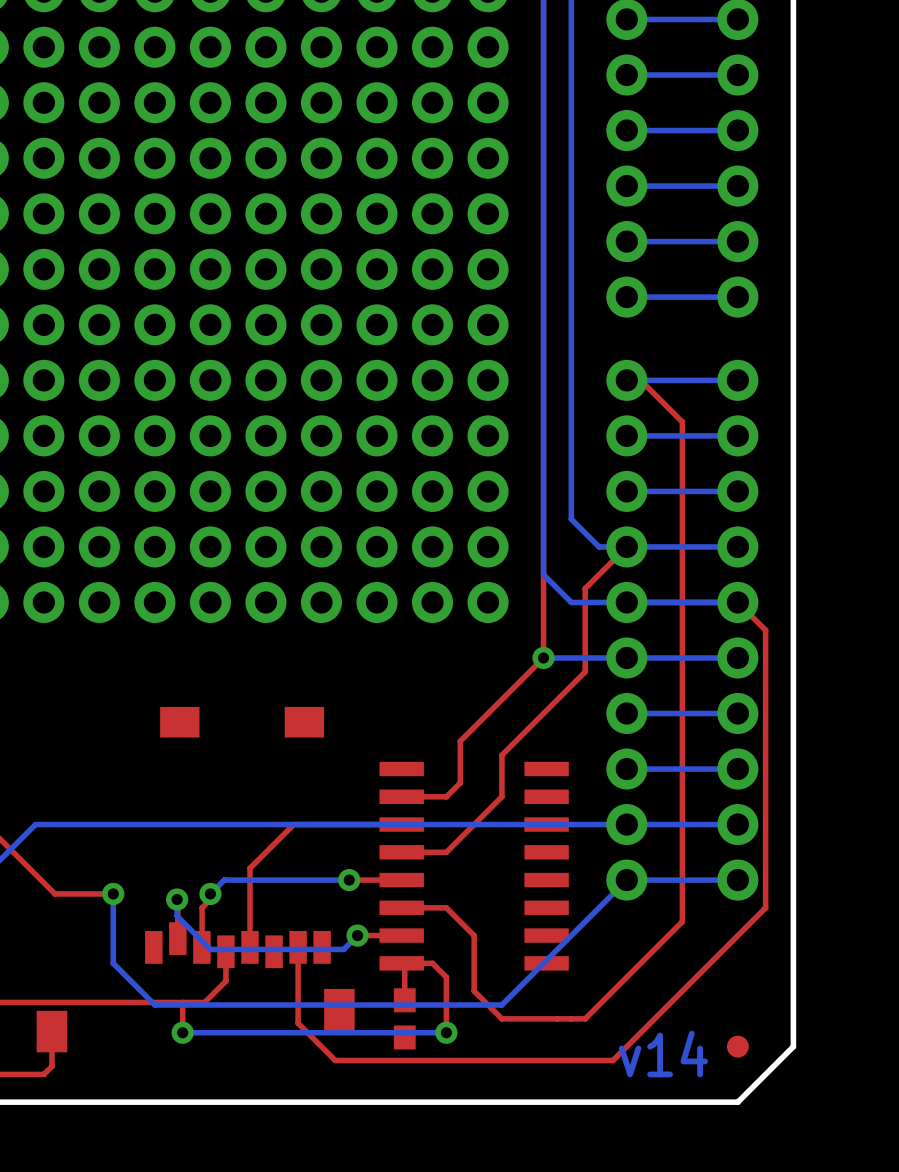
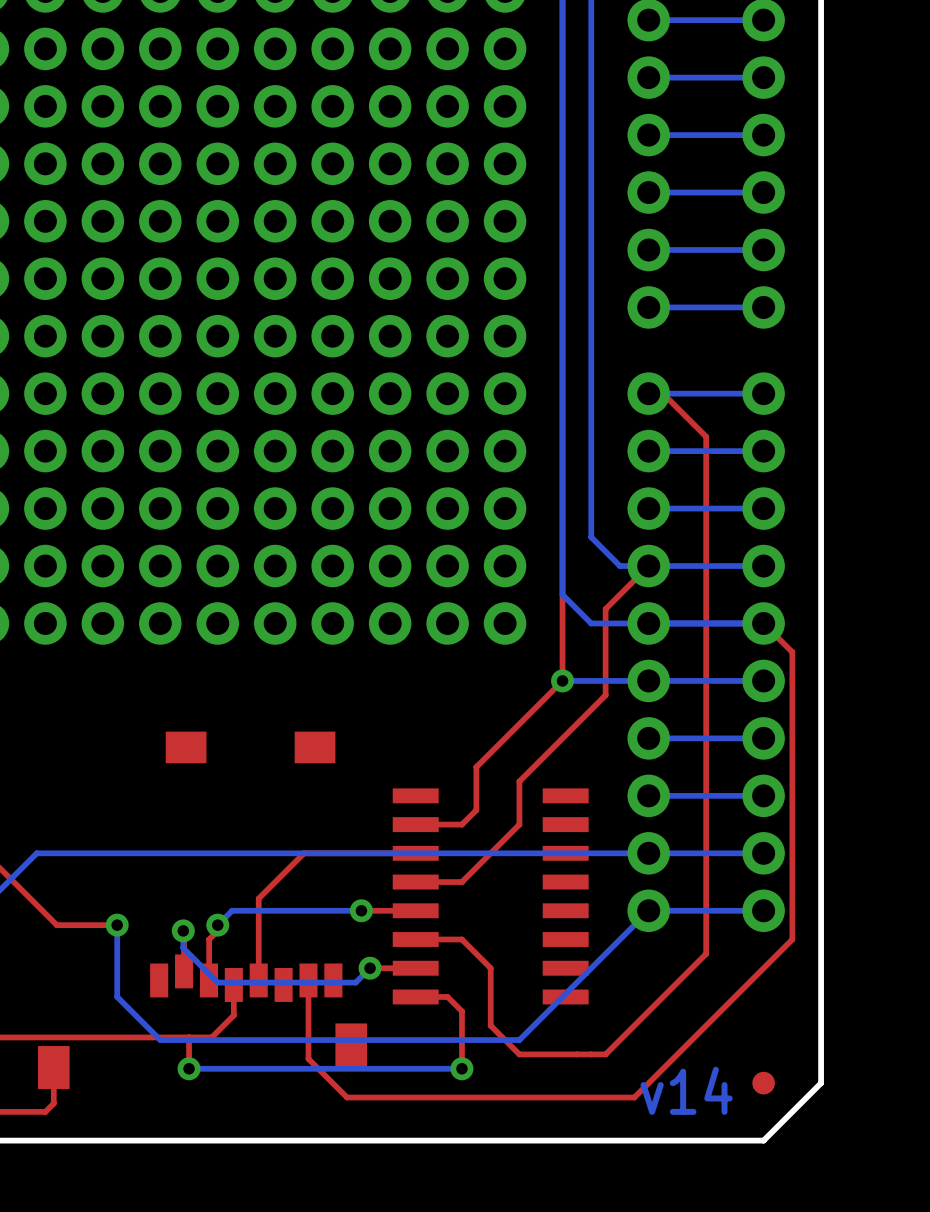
top track: (401, 963) (404, 966) (404, 1000) -> none
part: (404, 1018) -> none

